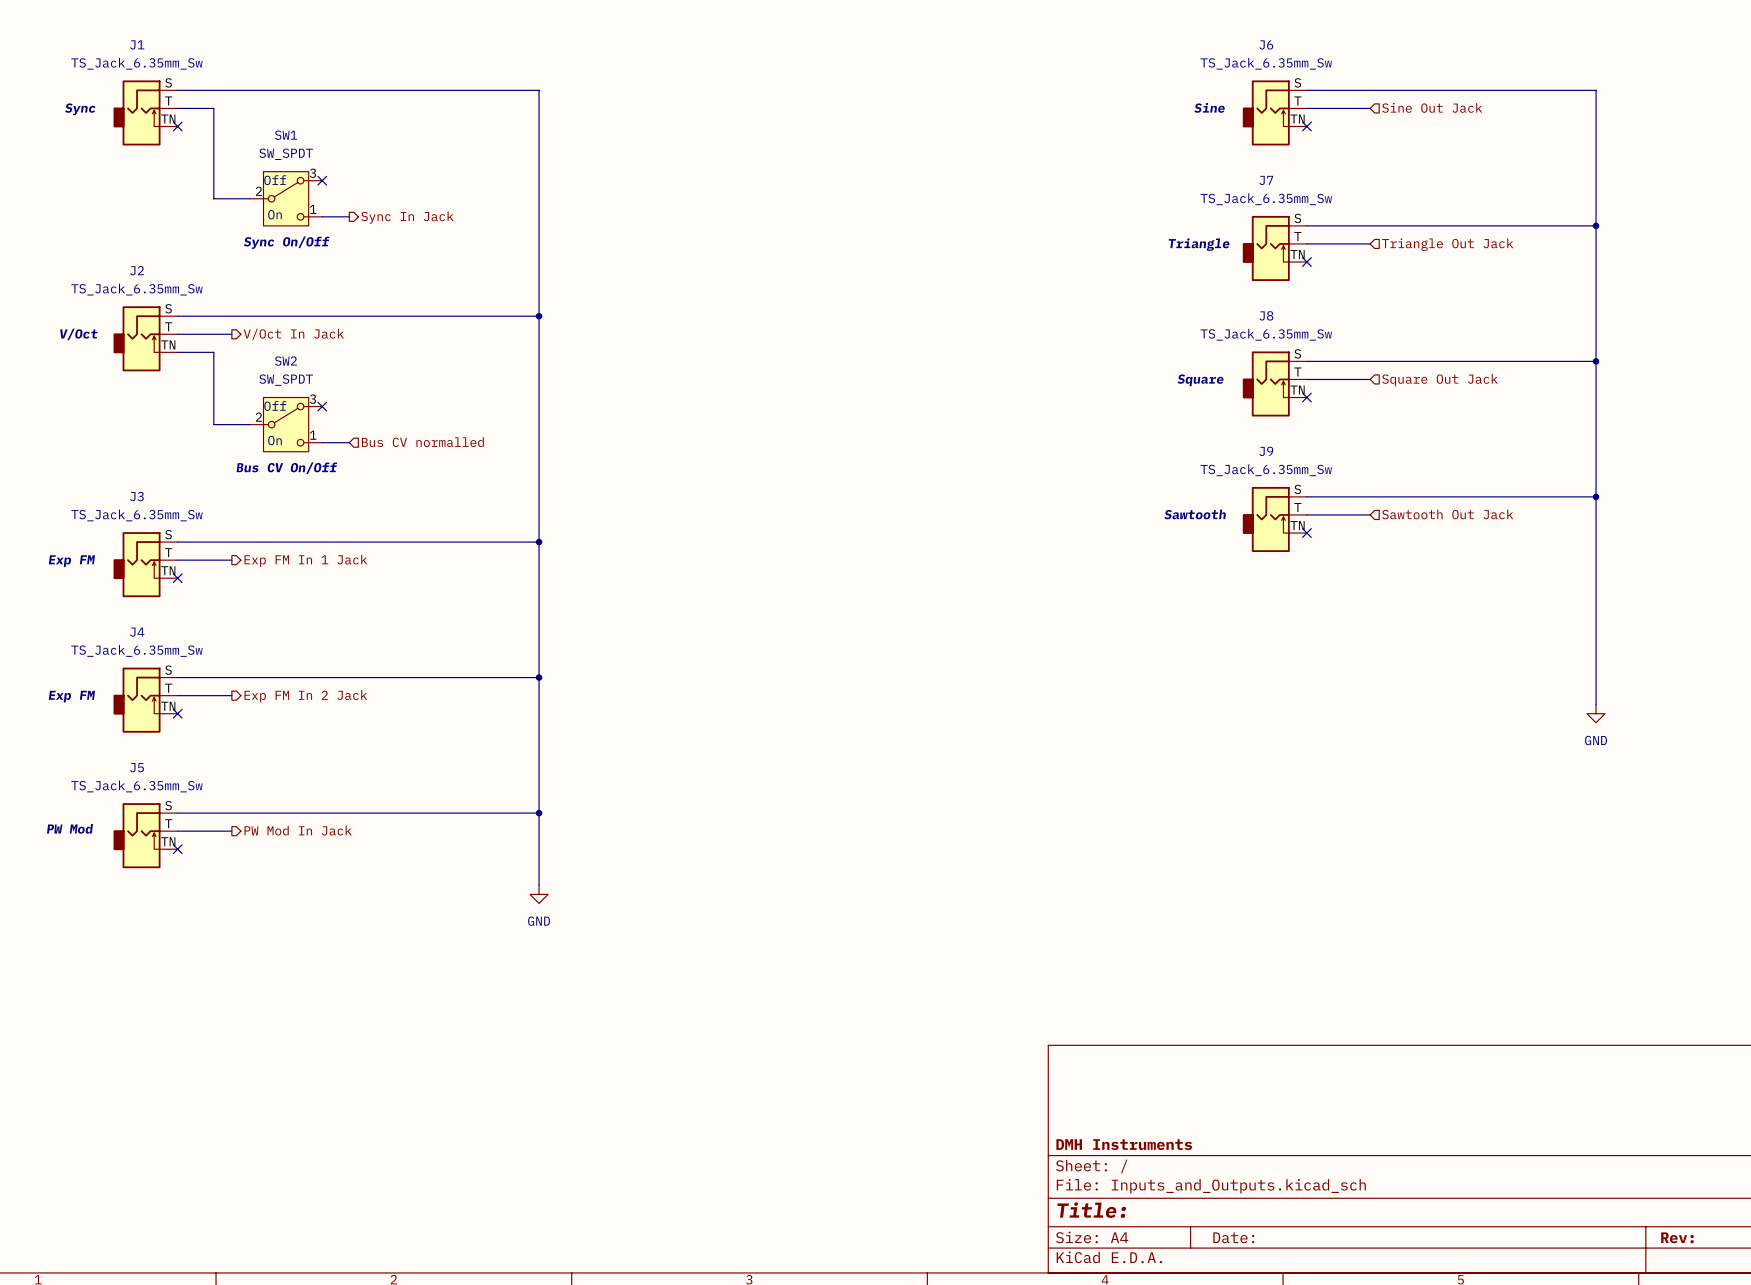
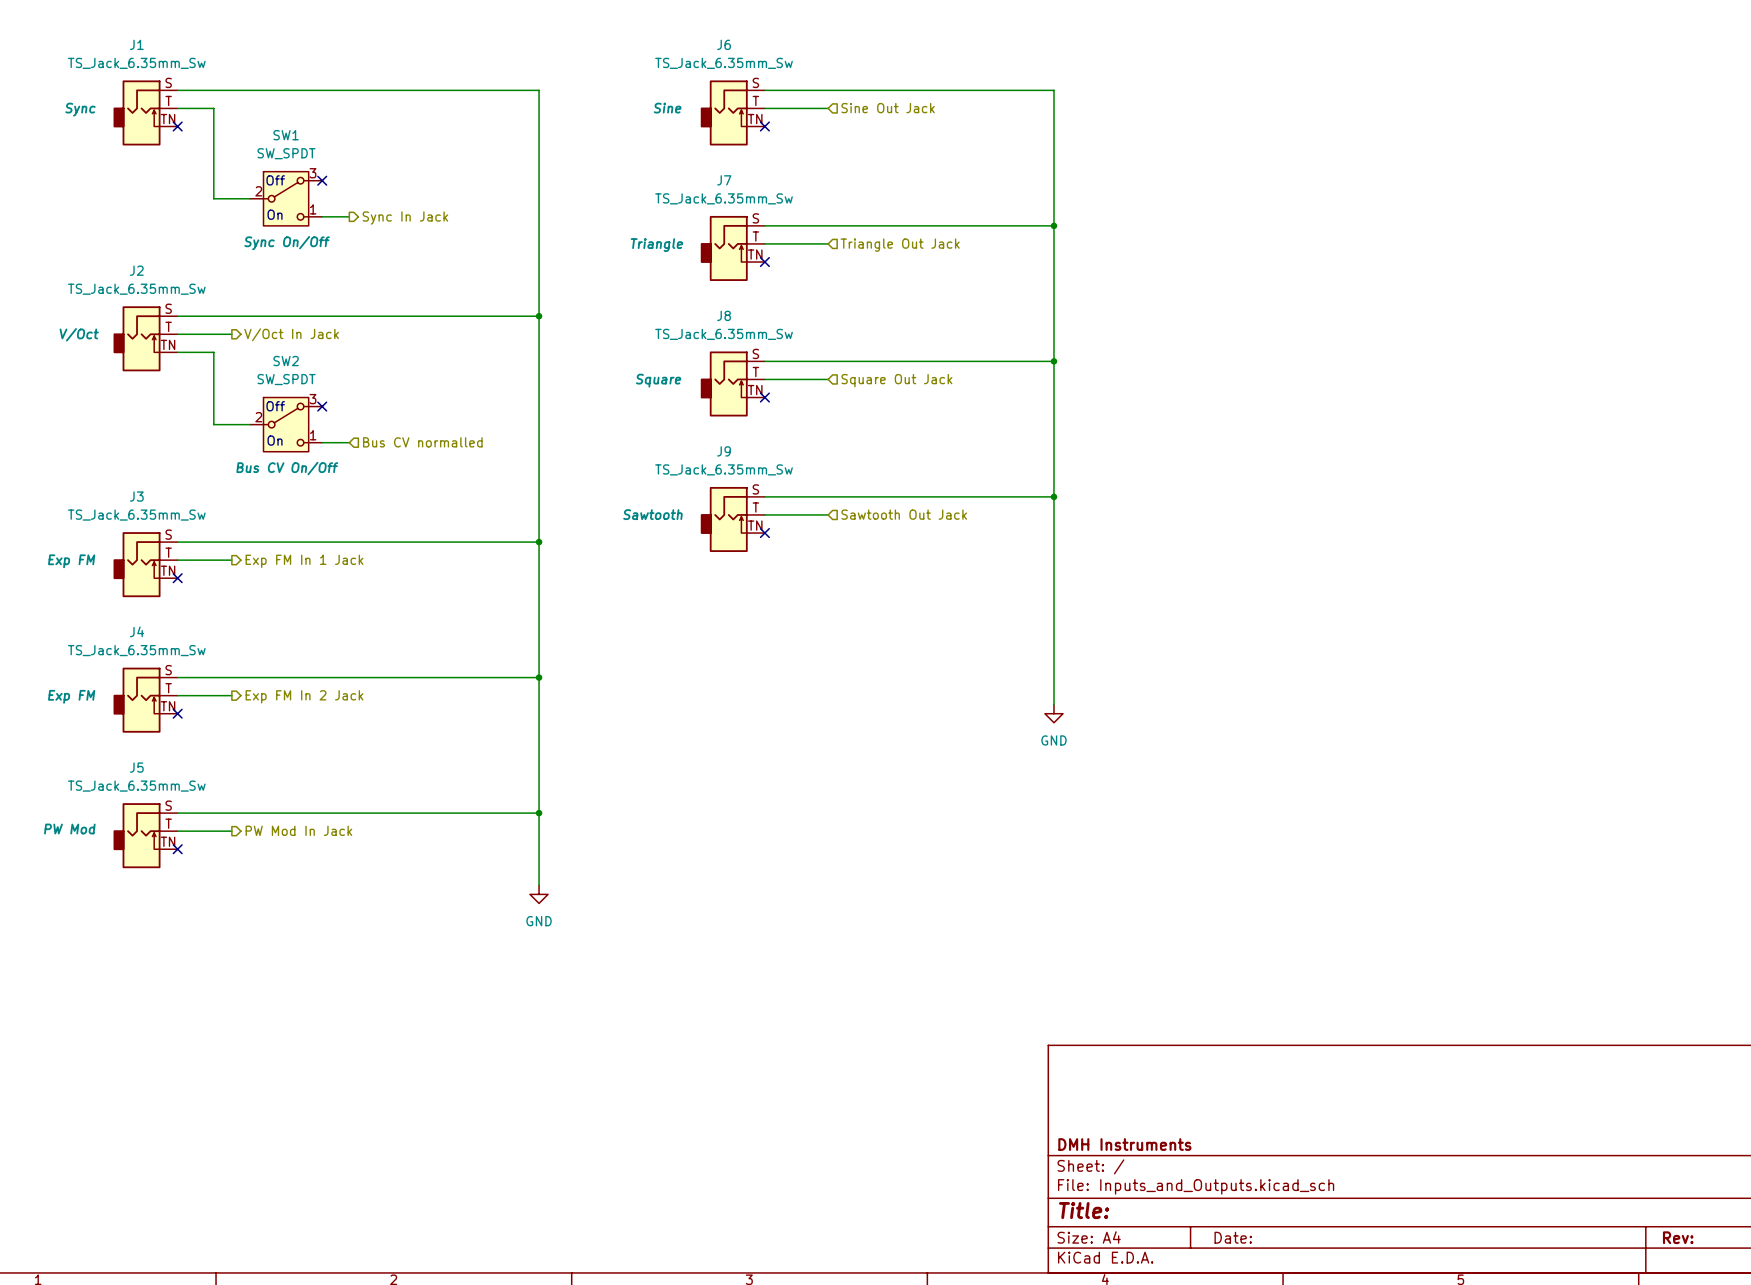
wire: none -> (764, 90) (1053, 90) (1053, 704)
wire: (1306, 90) (1596, 90) (1596, 704) -> none
hierarchical label: none -> Sine Out Jack (888, 108)
hierarchical label: Sine Out Jack (1432, 107) -> none
wire: none -> (764, 108) (828, 108)
wire: (1306, 108) (1370, 108) -> none
J6 position: (1274, 112) -> (732, 112)
no-connect mark: none -> (764, 126)
no-connect mark: (1306, 126) -> none
wire: none -> (764, 225) (1053, 225)
junction: none -> (1053, 225)
wire: (1306, 225) (1596, 225) -> none
junction: (1596, 225) -> none
wire: none -> (764, 243) (828, 243)
wire: (1306, 243) (1370, 243) -> none
hierarchical label: none -> Triangle Out Jack (900, 245)
hierarchical label: Triangle Out Jack (1447, 244) -> none
J7 position: (1274, 248) -> (732, 248)
no-connect mark: none -> (764, 262)
no-connect mark: (1306, 262) -> none
wire: none -> (764, 361) (1053, 361)
junction: none -> (1053, 361)
wire: (1306, 361) (1596, 361) -> none
junction: (1596, 361) -> none
wire: none -> (764, 379) (828, 379)
wire: (1306, 379) (1370, 379) -> none
hierarchical label: none -> Square Out Jack (896, 380)
hierarchical label: Square Out Jack (1440, 380) -> none
J8 position: (1274, 383) -> (732, 383)
no-connect mark: none -> (764, 397)
no-connect mark: (1306, 397) -> none
wire: none -> (764, 496) (1053, 496)
junction: none -> (1053, 496)
wire: (1306, 496) (1596, 496) -> none
junction: (1596, 496) -> none
wire: none -> (764, 514) (828, 514)
hierarchical label: none -> Sawtooth Out Jack (904, 514)
wire: (1306, 514) (1370, 514) -> none
hierarchical label: Sawtooth Out Jack (1447, 514) -> none
J9 position: (1274, 519) -> (732, 519)
no-connect mark: none -> (764, 533)
no-connect mark: (1306, 533) -> none
power symbol: none -> GND (1053, 713)
power symbol: GND (1596, 713) -> none

